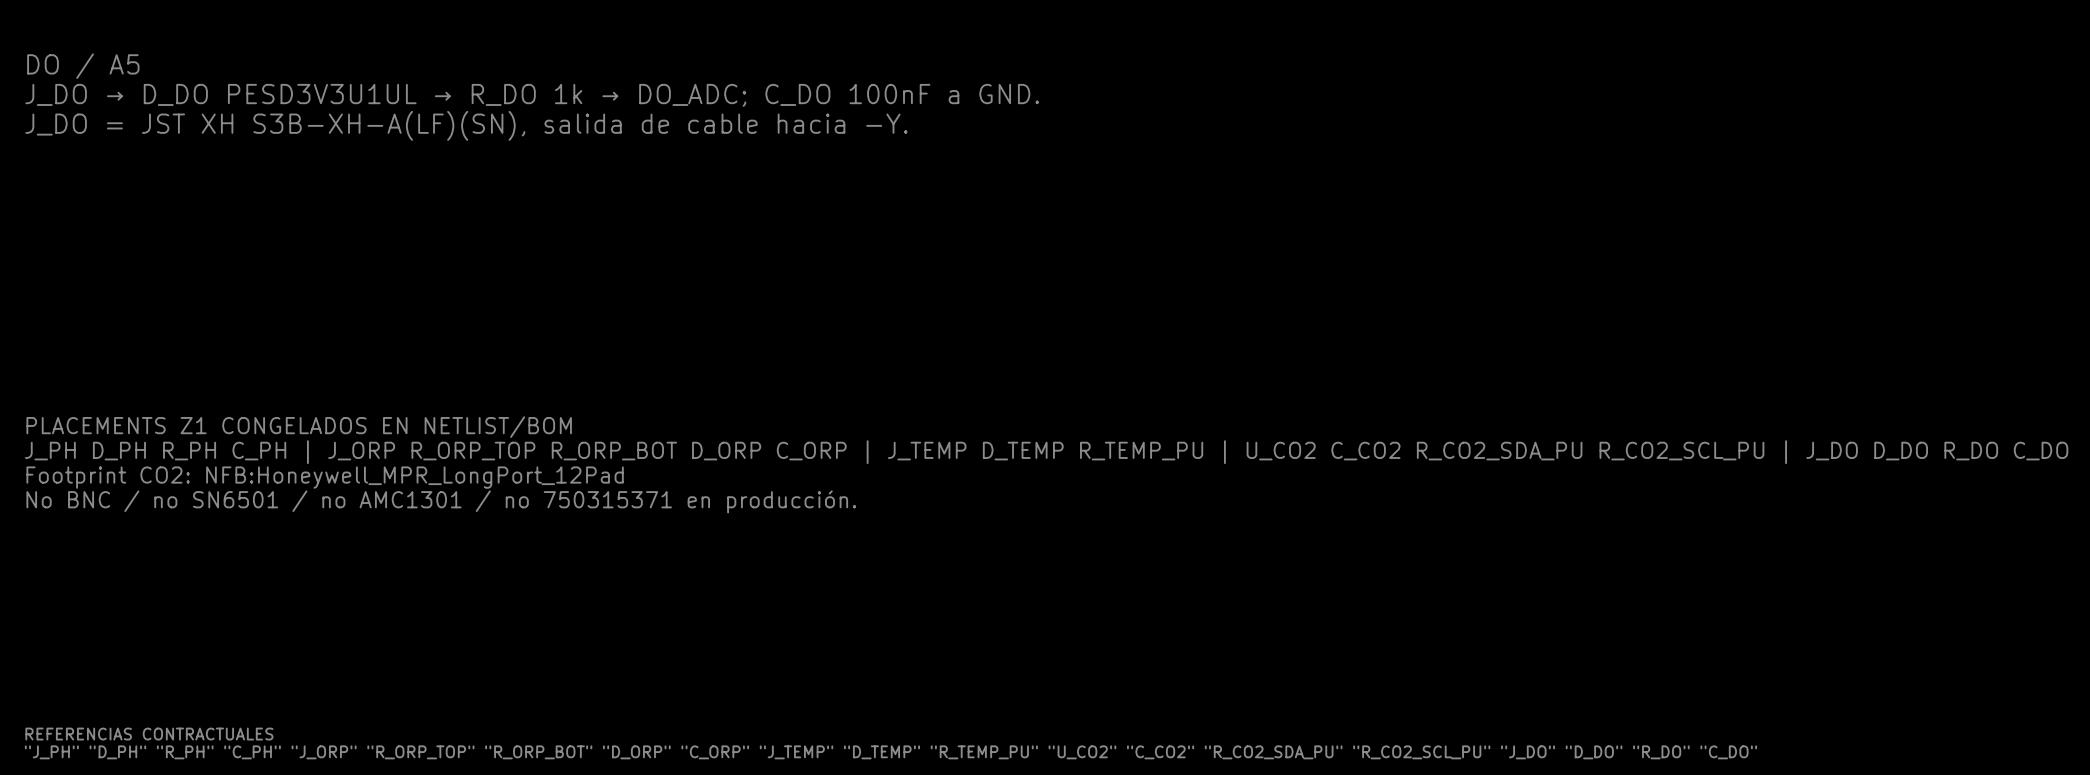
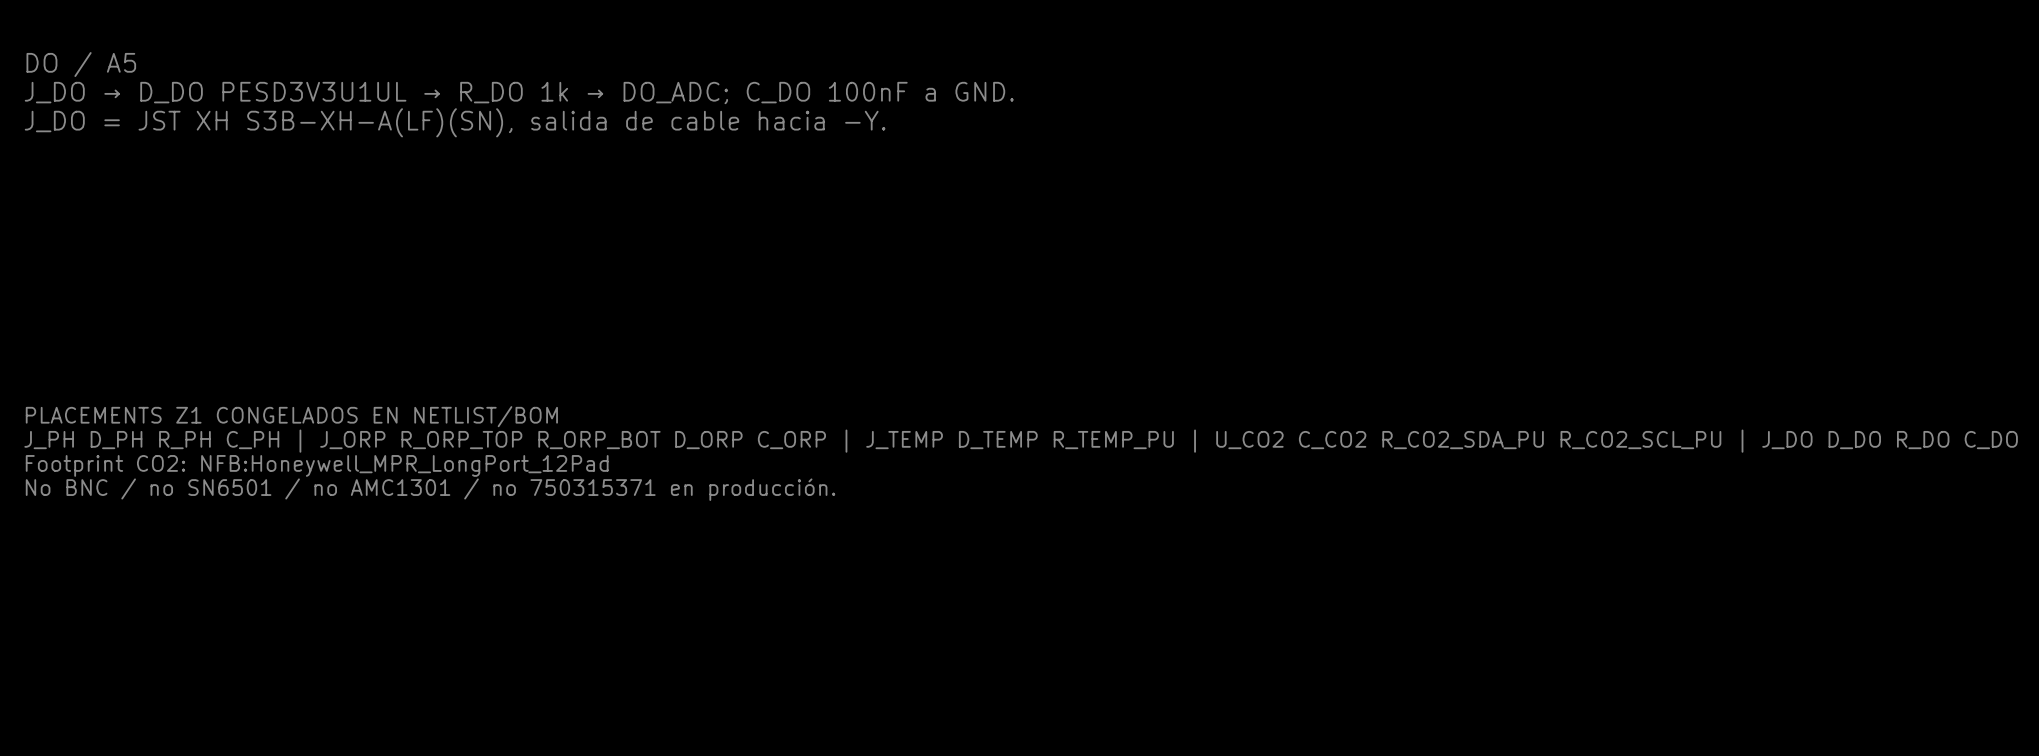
text: REFERENCIAS CONTRACTUALES (149, 734) -> none
text: "J_PH" "D_PH" "R_PH" "C_PH" "J_ORP" "R_ORP_TOP" "R_ORP_BOT" "D_ORP" "C_ORP" "J_TEMP" "D_TEMP" "R_TEMP_PU" "U_CO2" "C_CO2" "R_CO2_SDA_PU" "R_CO2_SCL_PU" "J_DO" "D_DO" "R_DO" "C_DO" (890, 752) -> none

